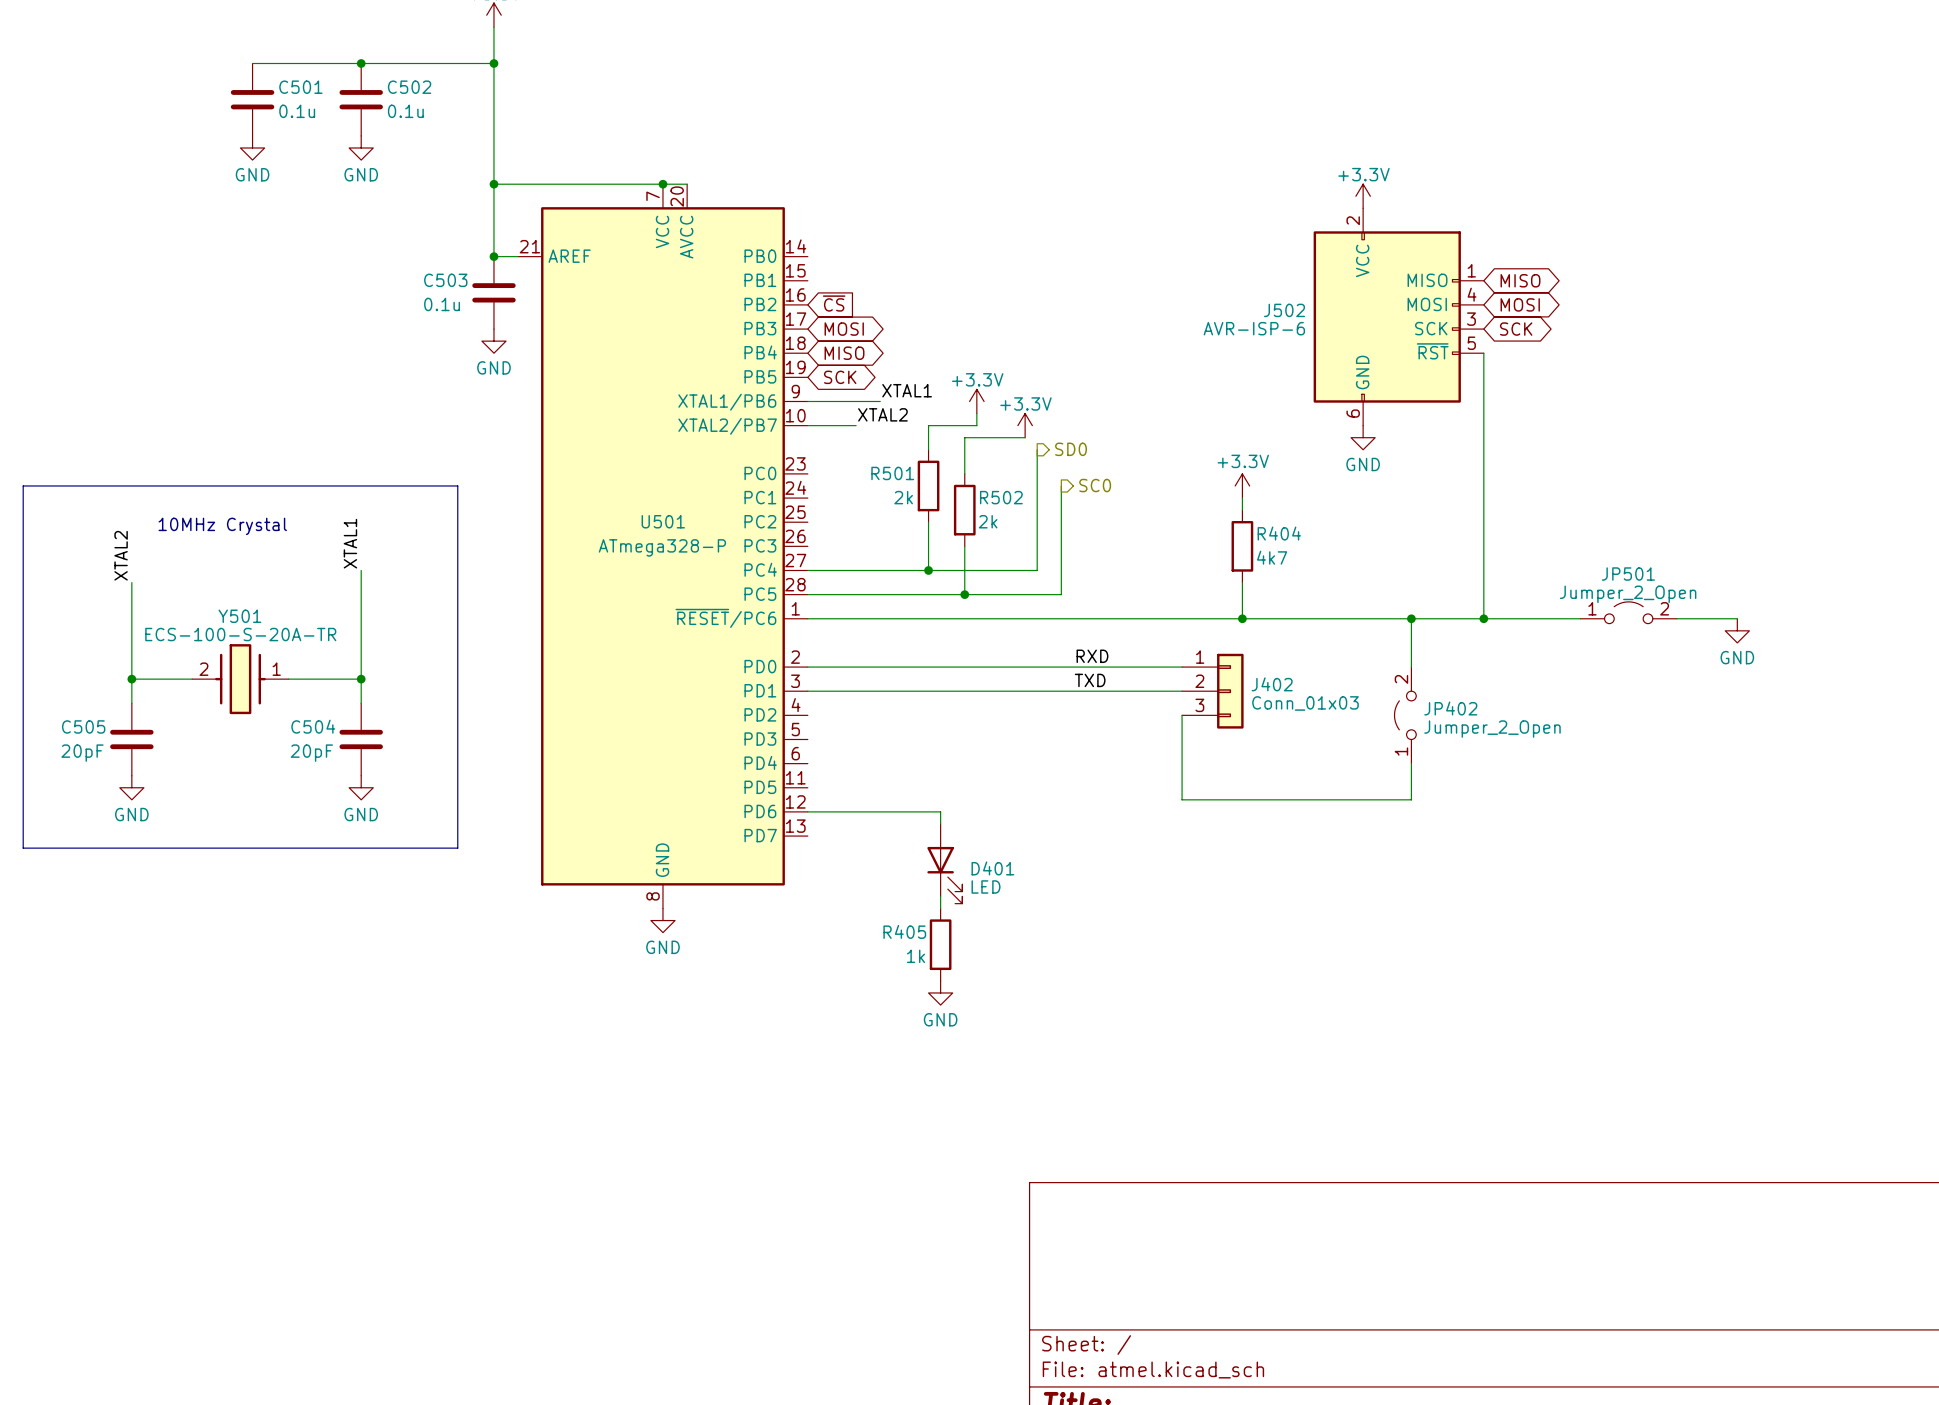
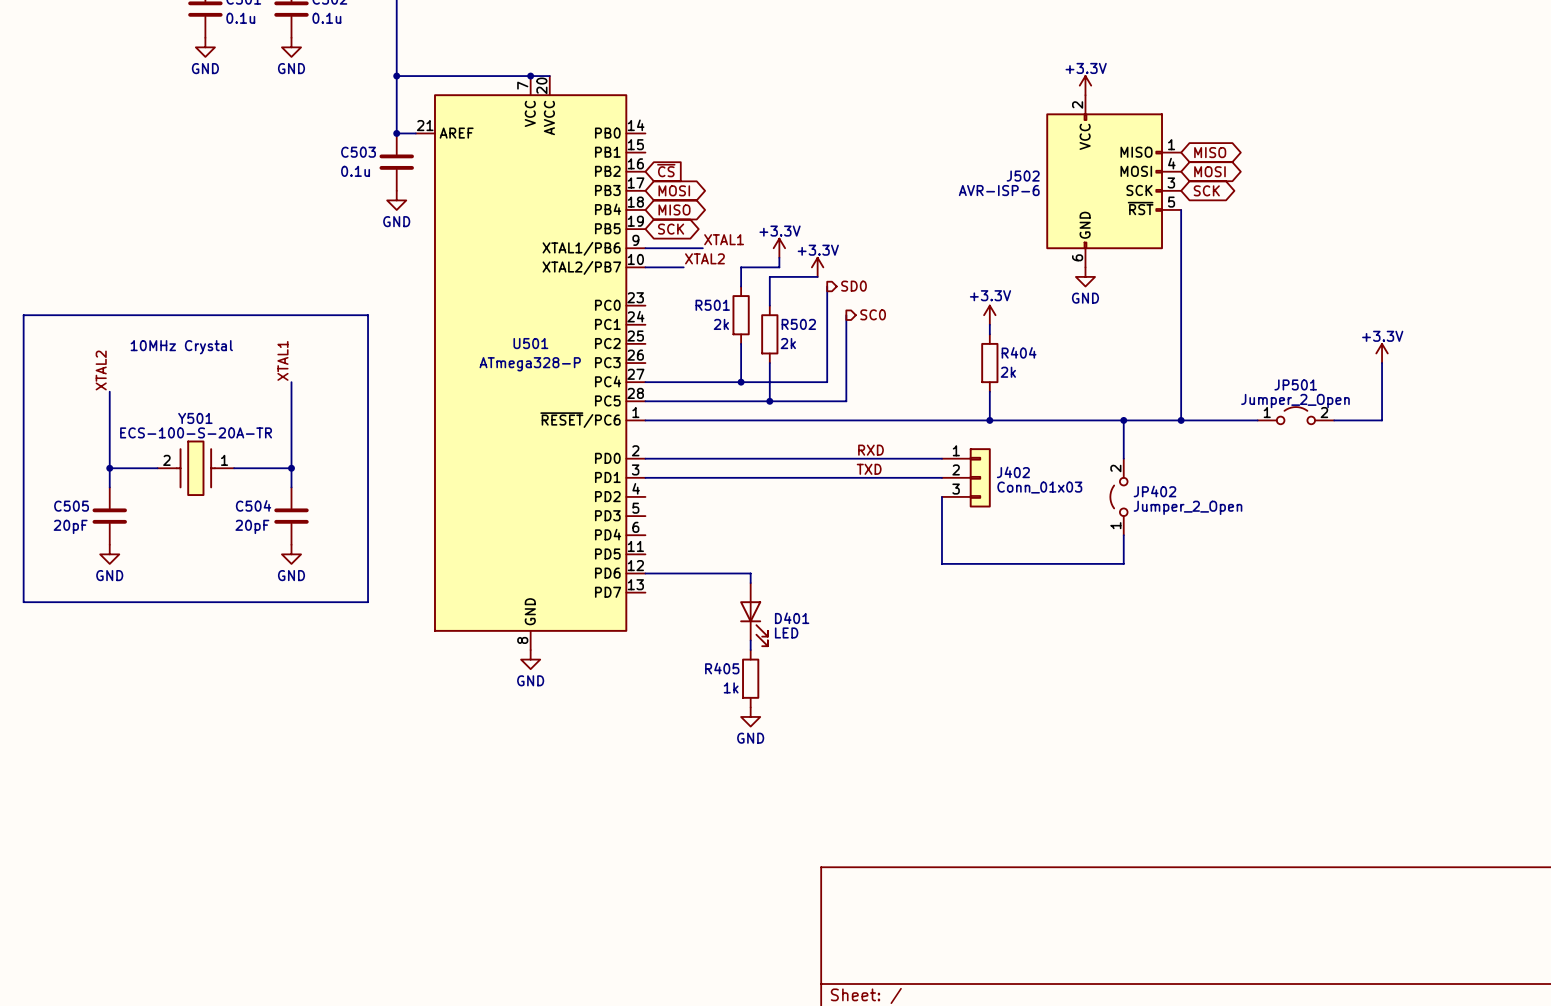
power symbol: none -> +3.3V (1382, 353)
wire: none -> (1382, 363) (1382, 420)
R404 value: 4k7 (1272, 557) -> 2k (1008, 372)
power symbol: GND (1737, 630) -> none

